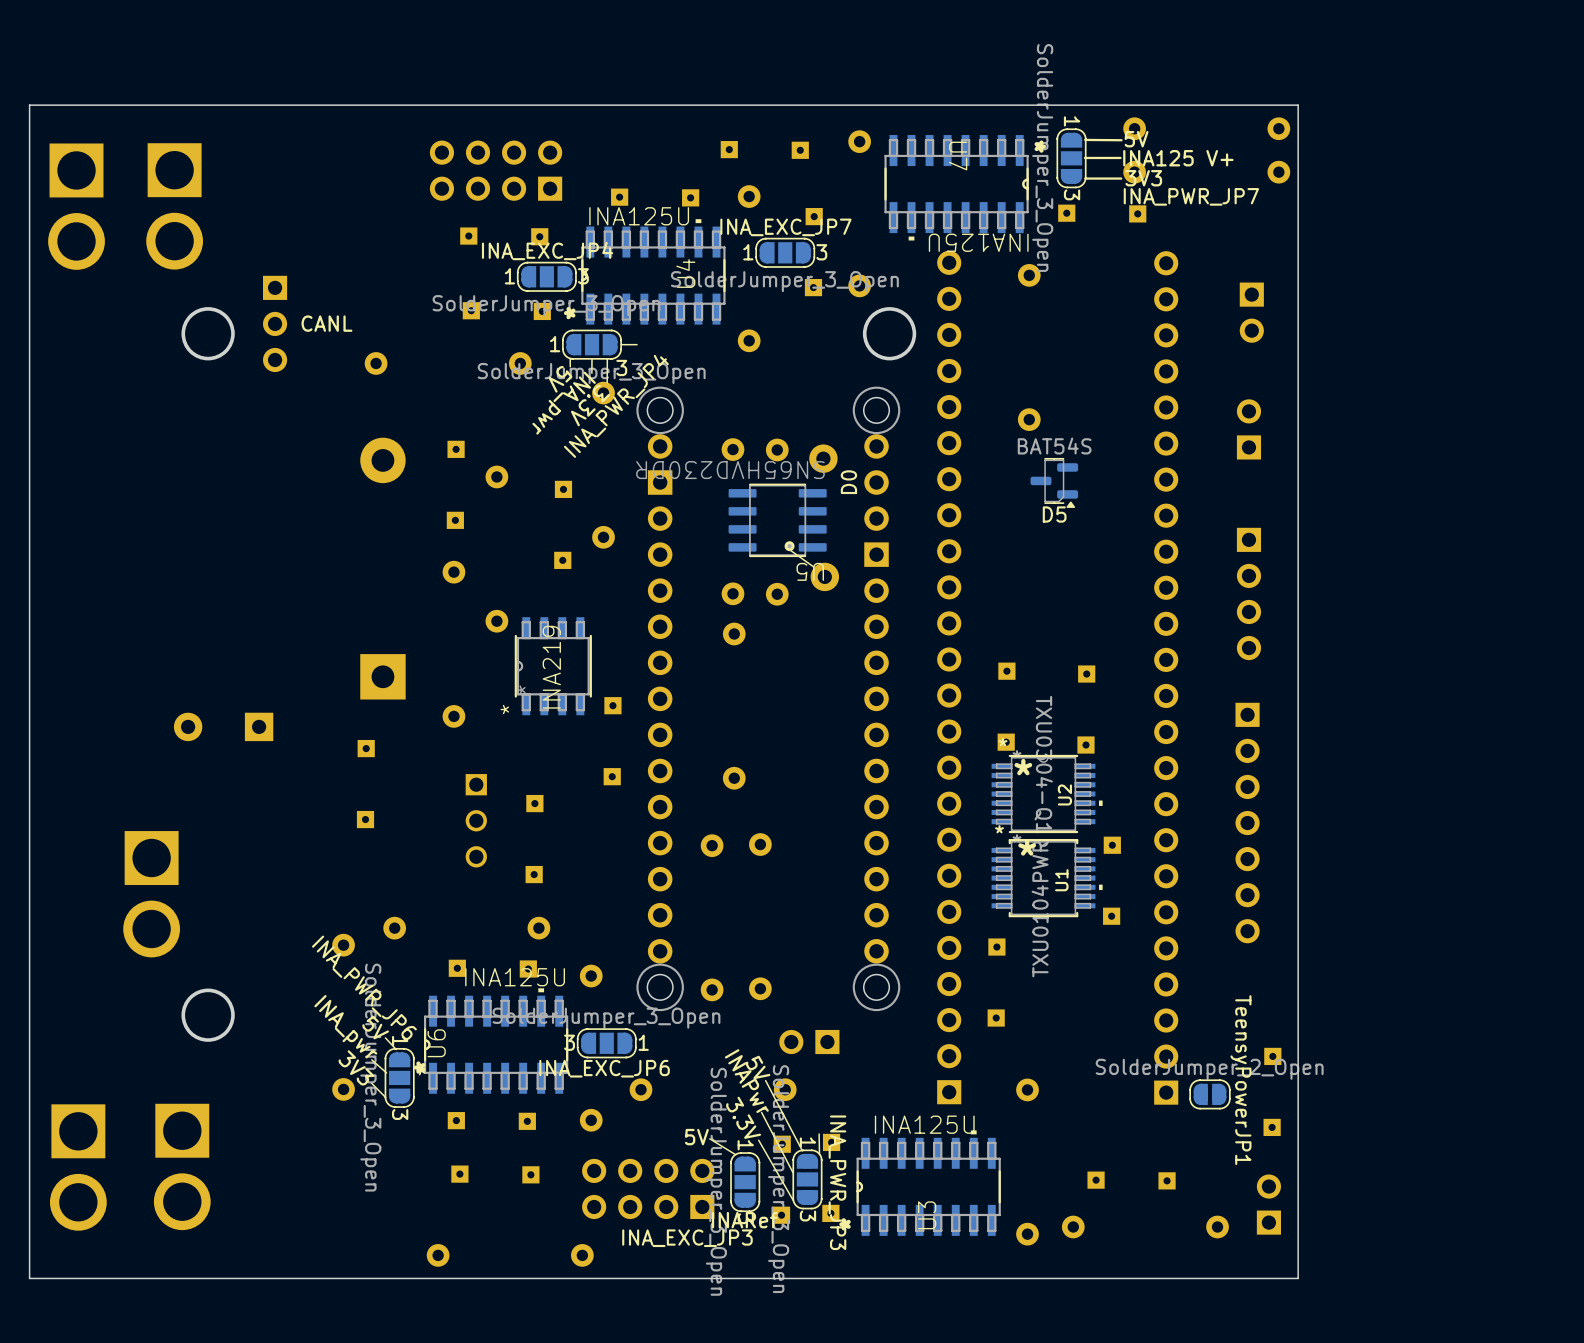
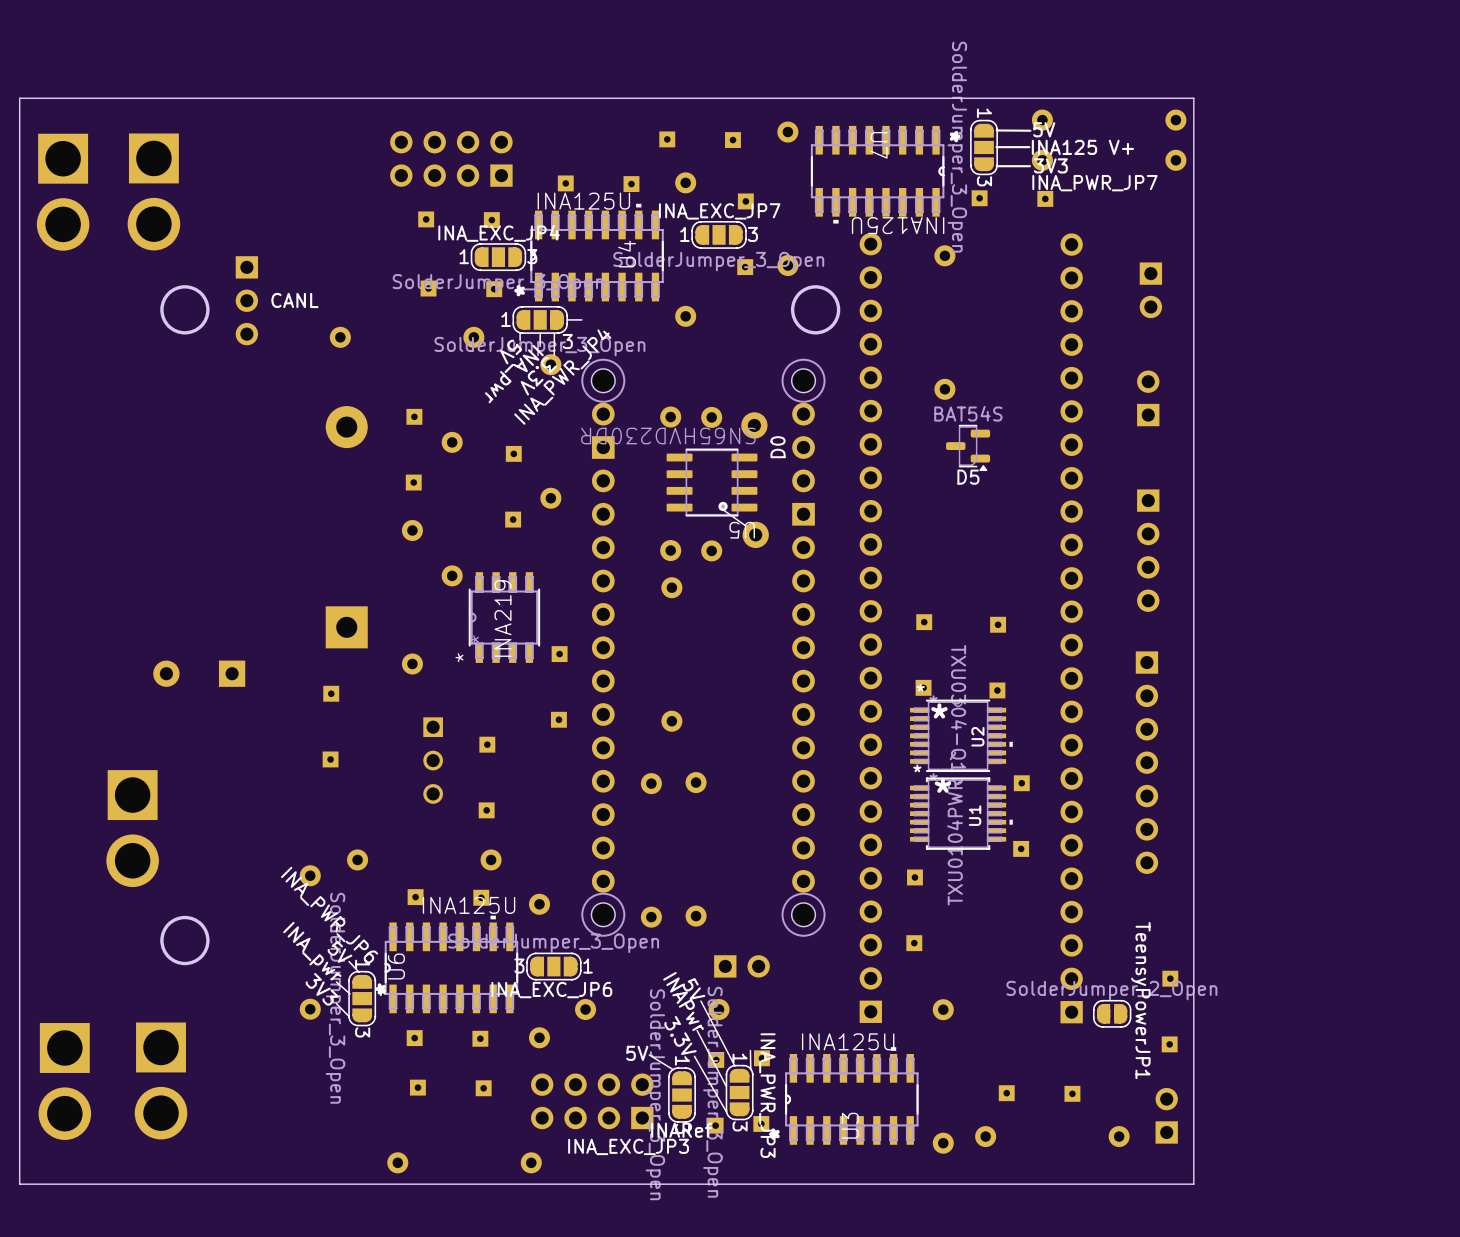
part rotation: 0° (809, 1042) -> 180° (741, 966)

